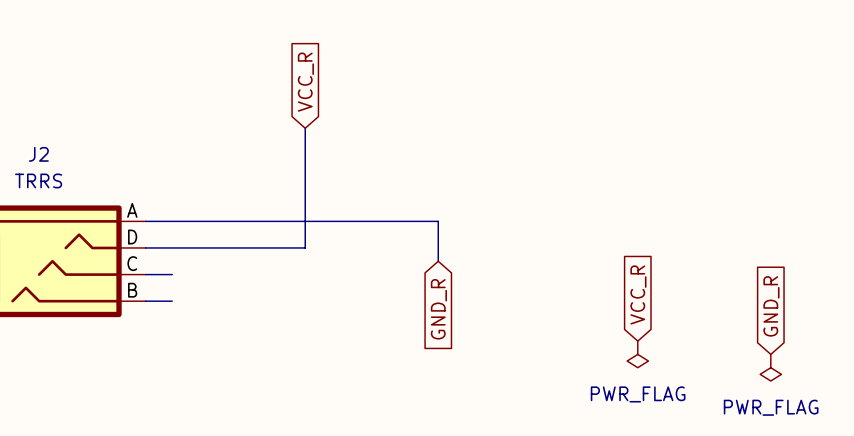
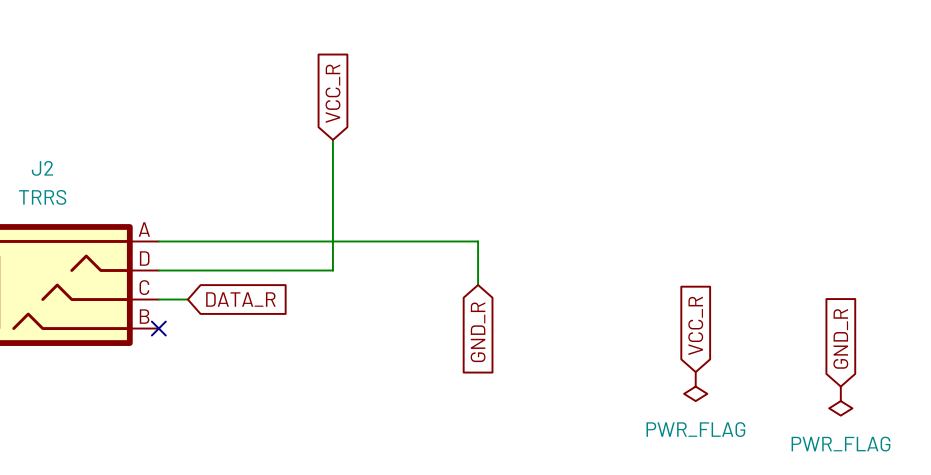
global label: none -> DATA_R (240, 299)
wire: (145, 301) (172, 301) -> none
no-connect mark: none -> (158, 328)

